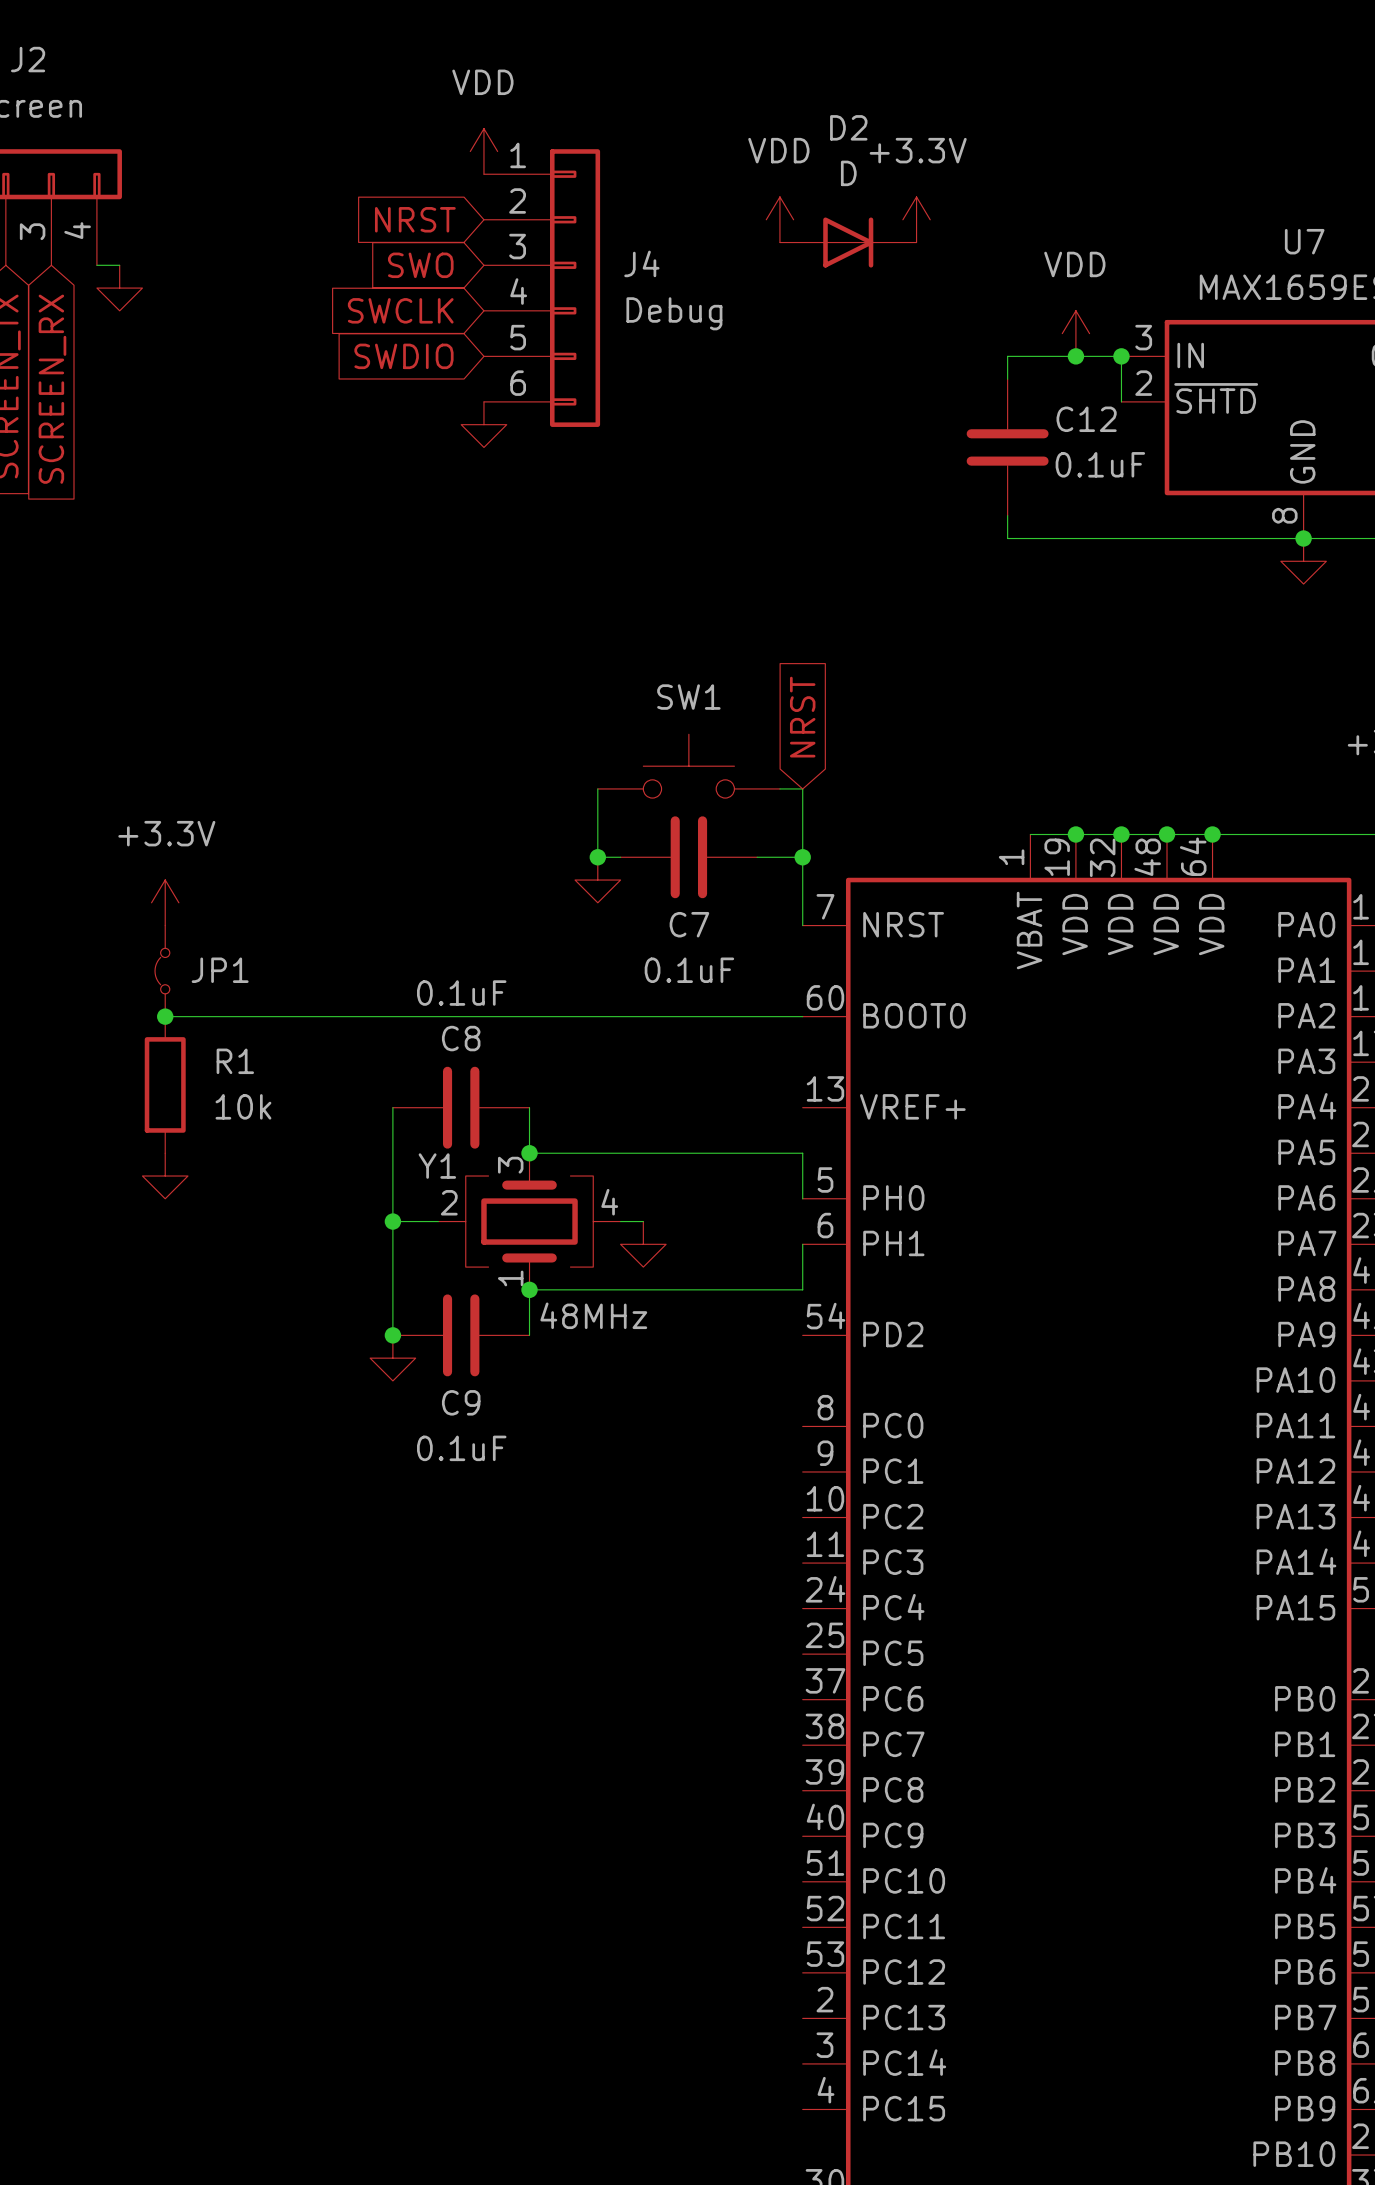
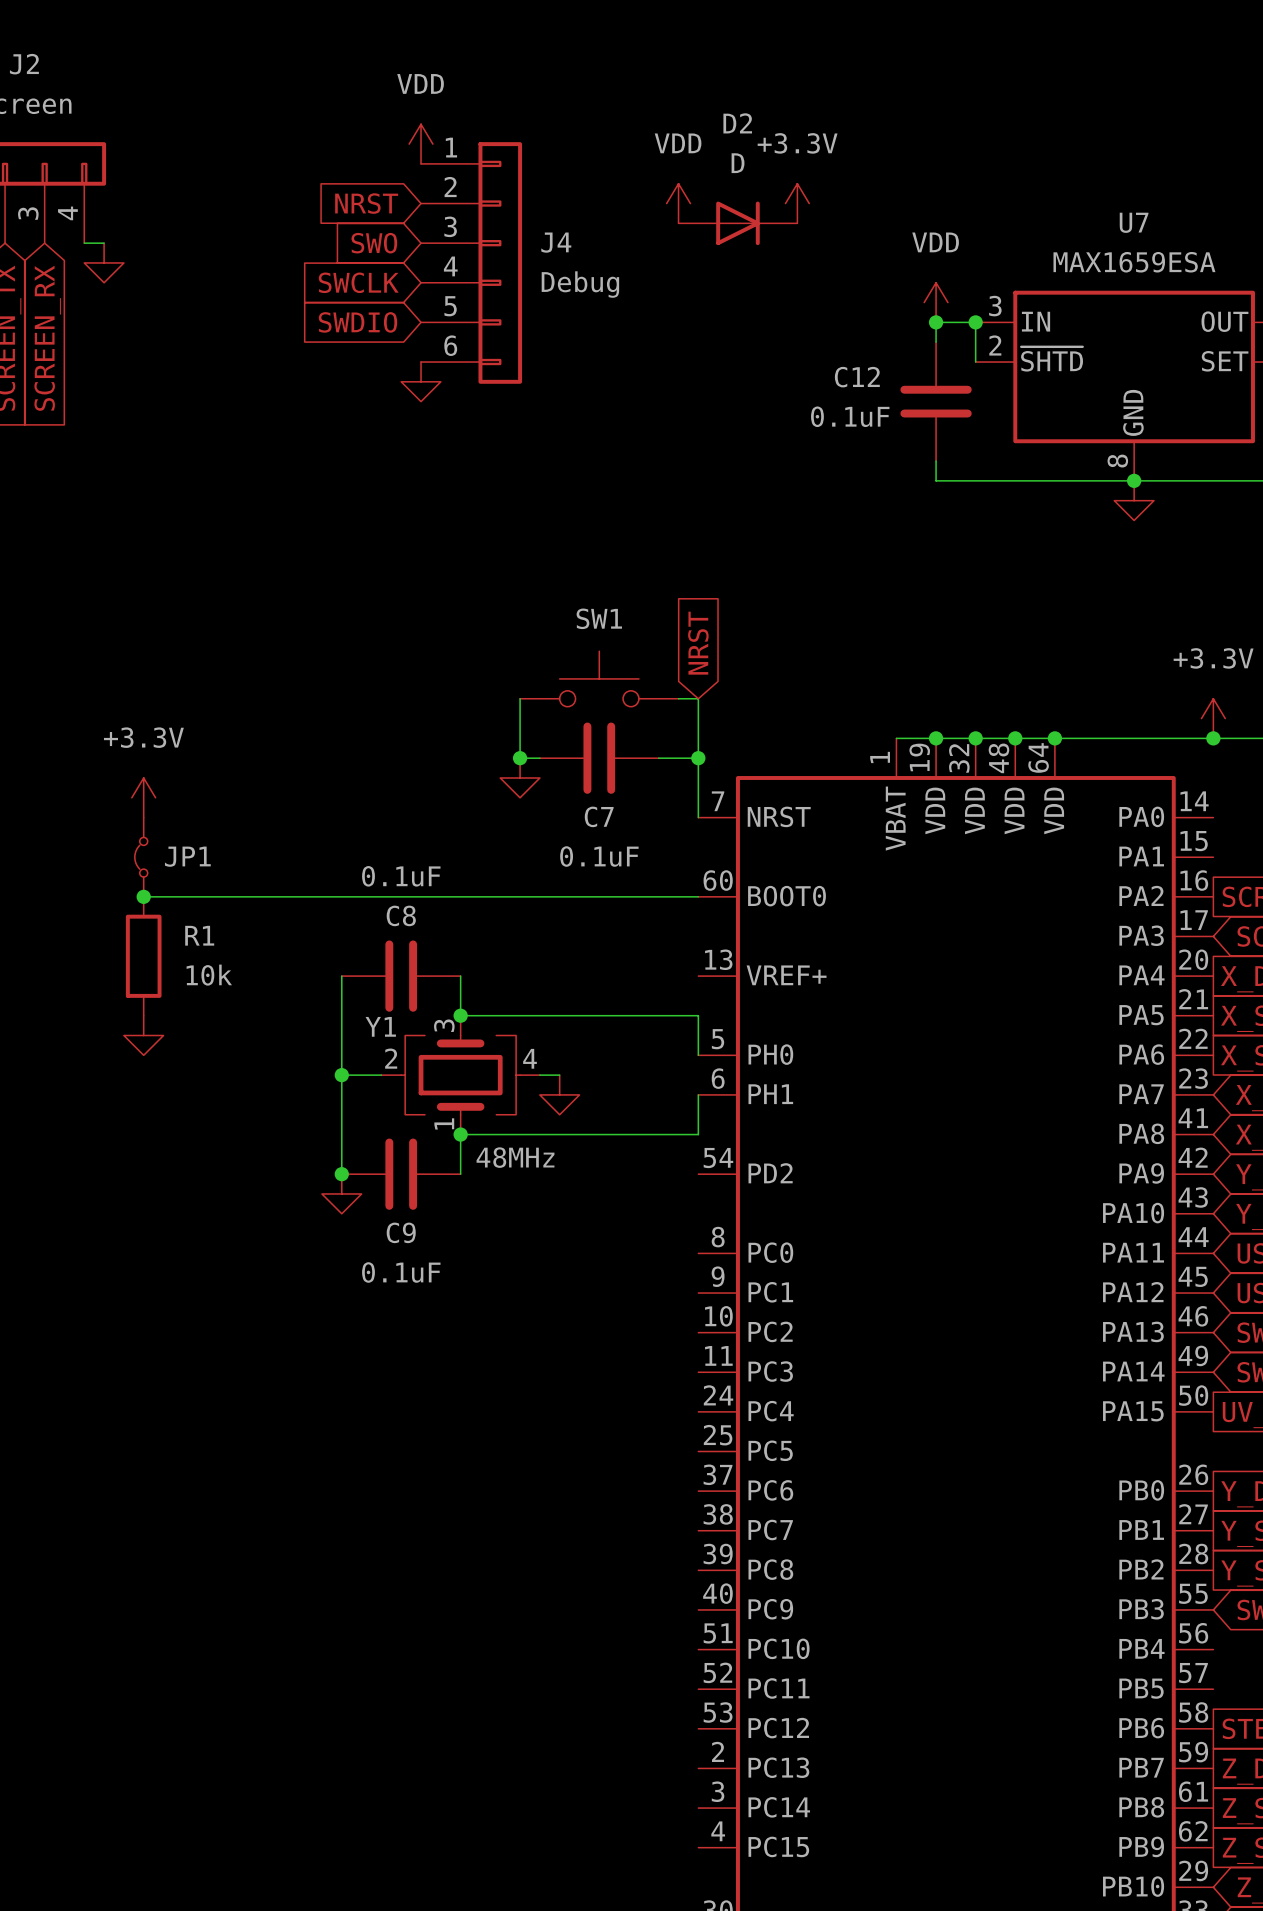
wire: (1075, 356) (1007, 356) (1007, 379) -> (936, 322) (936, 342)
C12 name position: C12 (1086, 419) -> C12 (857, 377)
C12 position: (1007, 447) -> (936, 401)
C12 value position: 0.1uF (1100, 464) -> 0.1uF (850, 416)
wire: (1007, 515) (1007, 538) (1075, 538) -> (936, 461) (936, 480)

